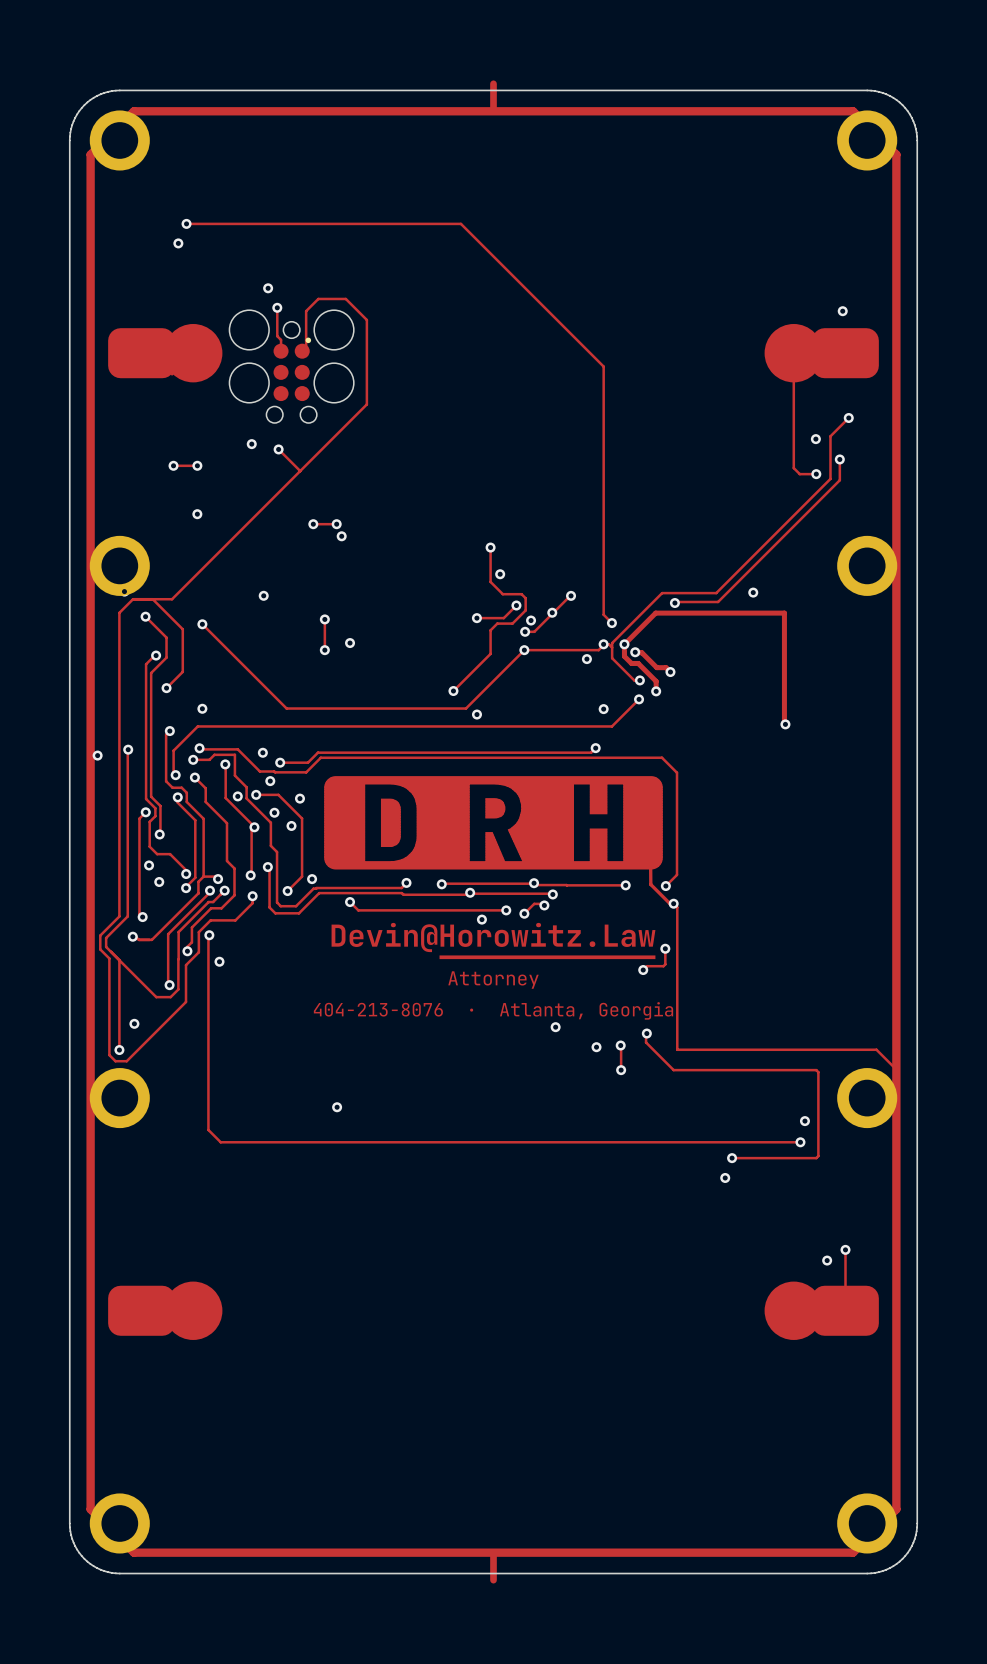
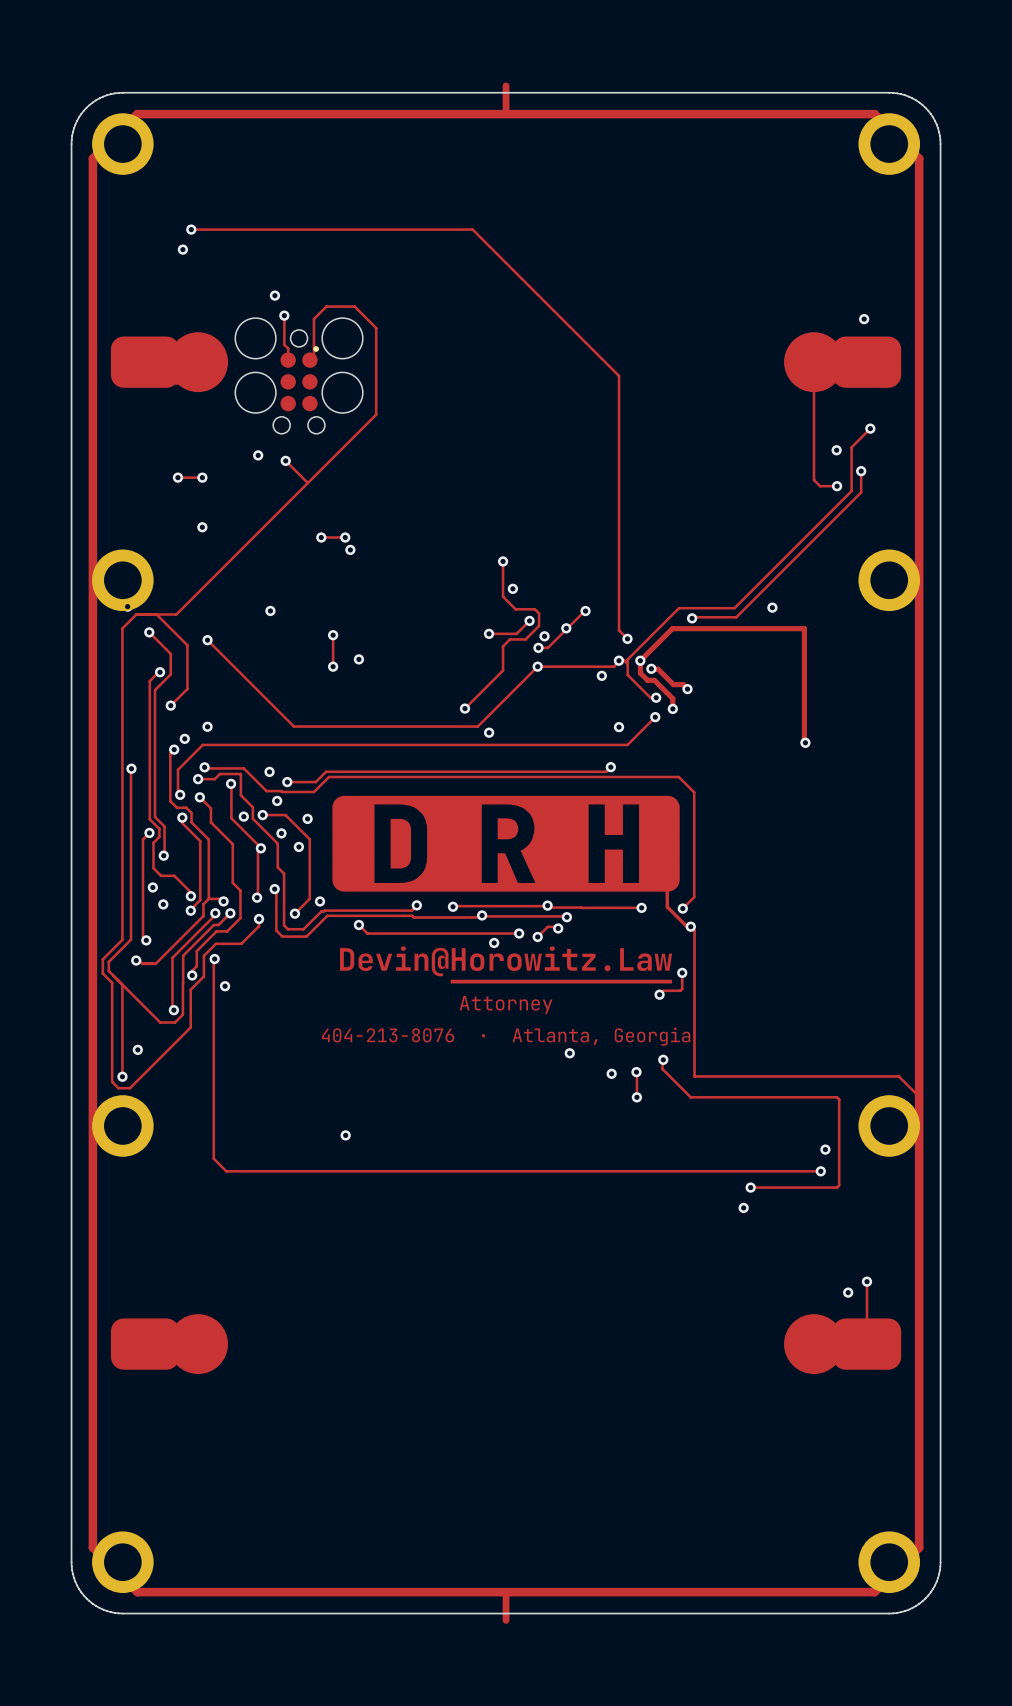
via position: (97, 755) -> (184, 738)

